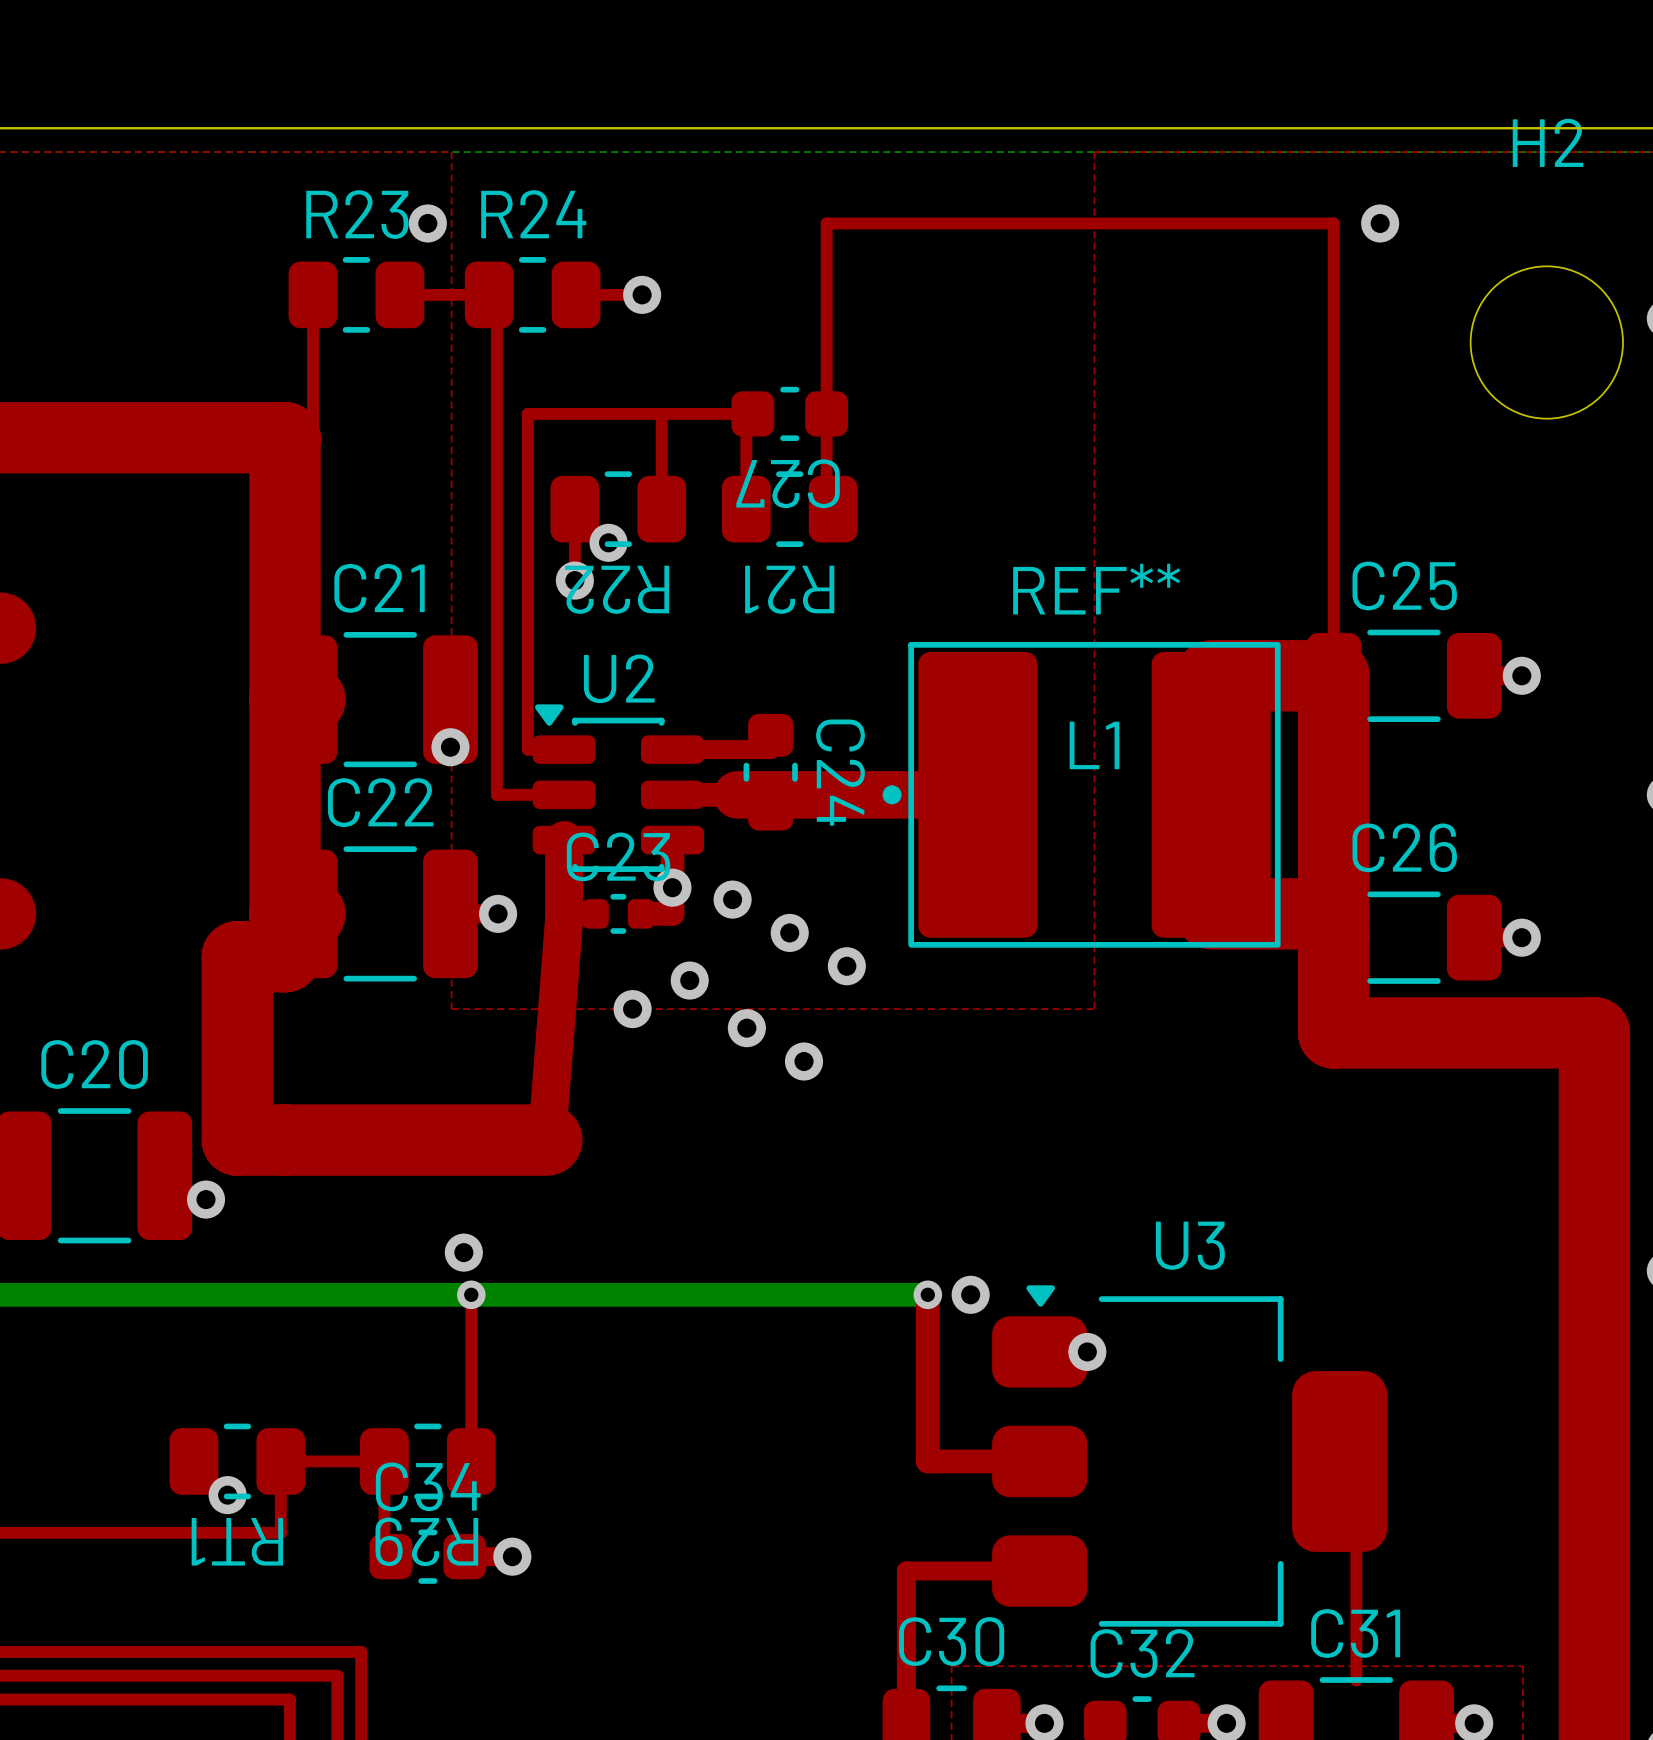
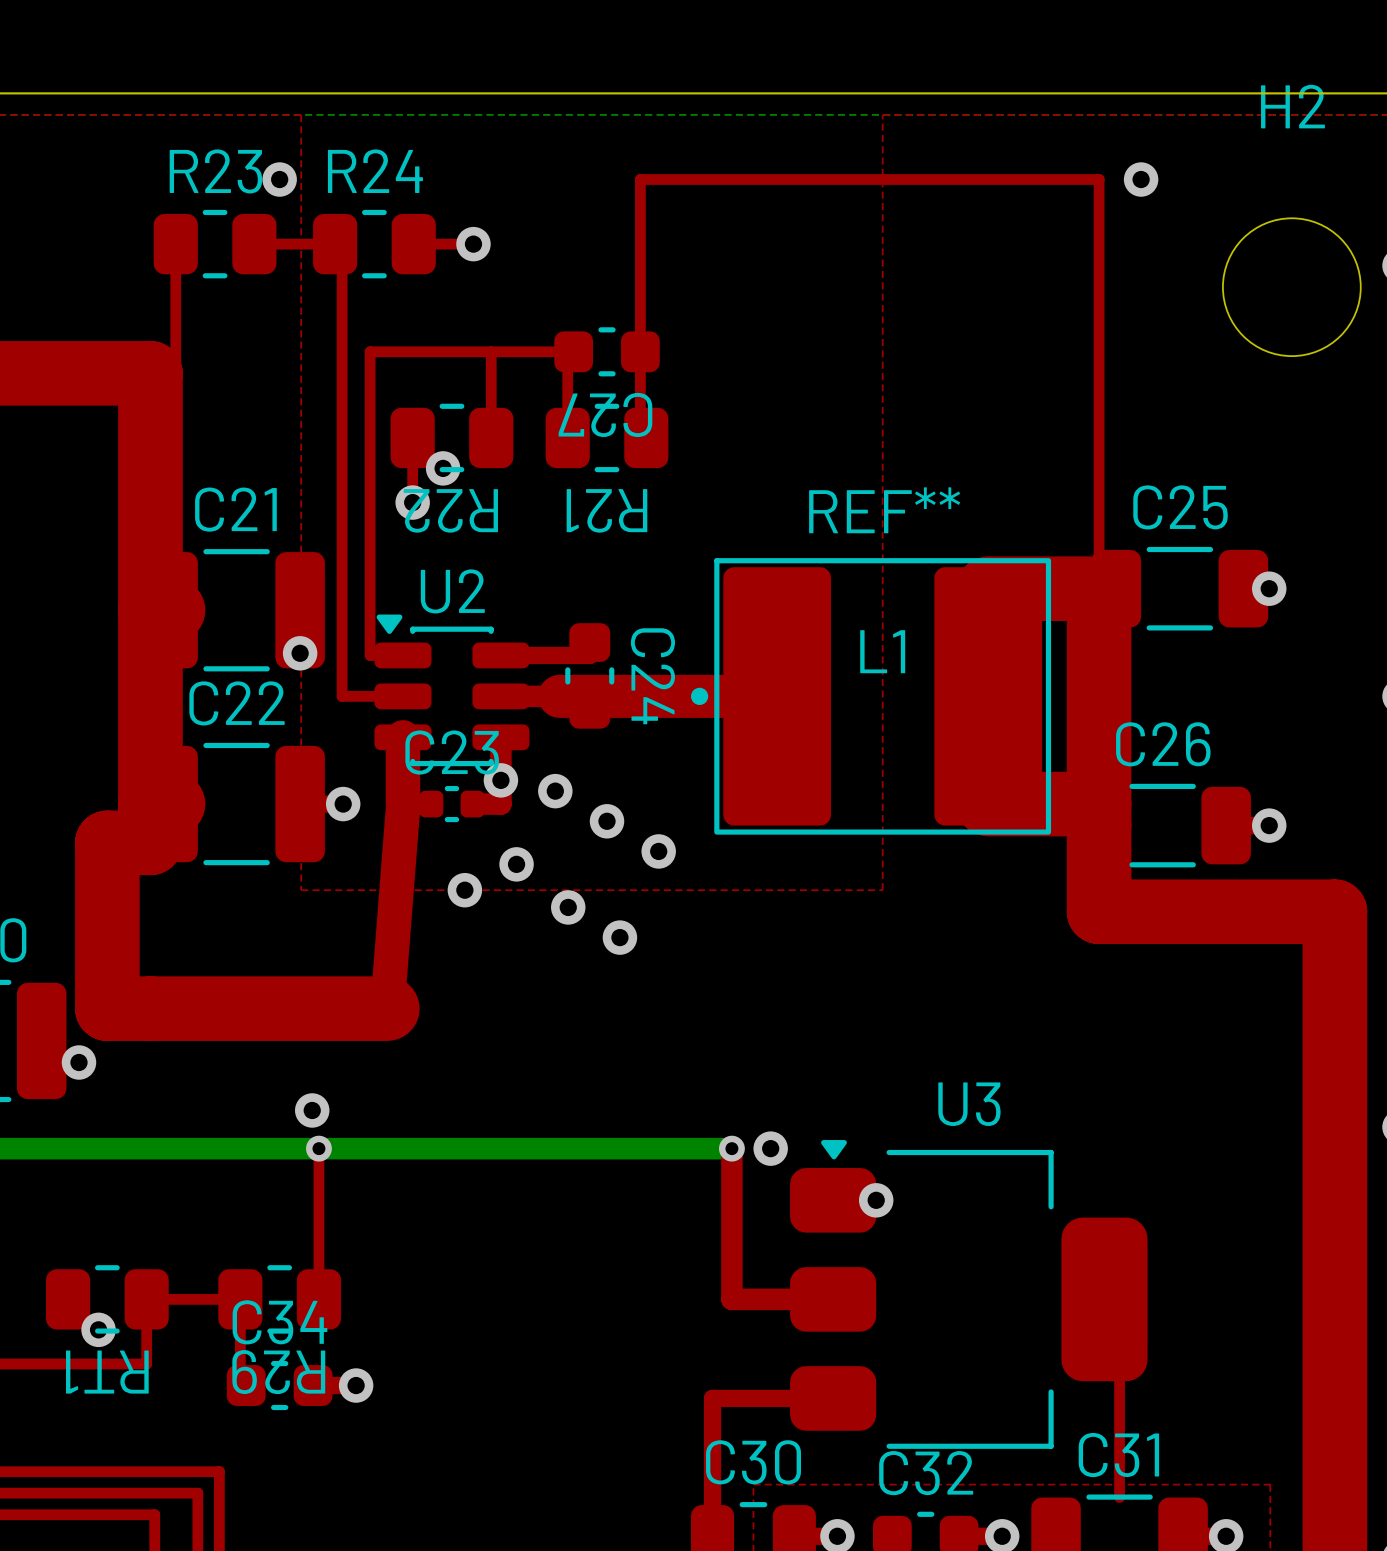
C25 position: (1403, 675) -> (1179, 588)

